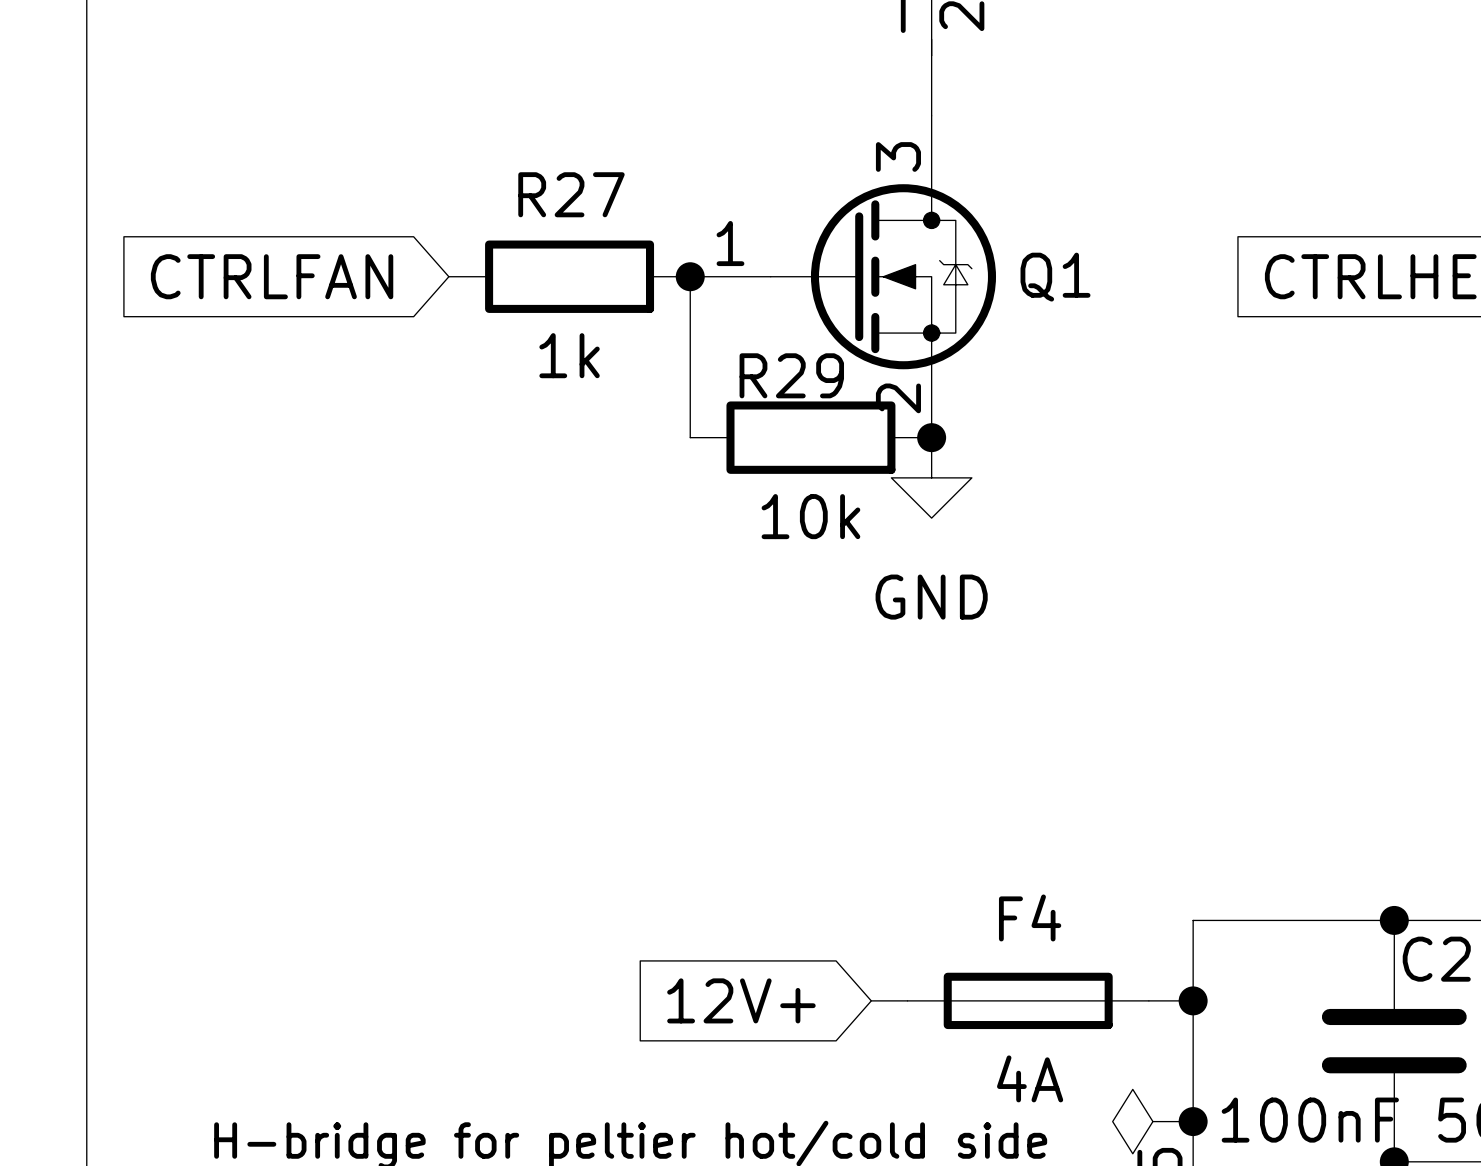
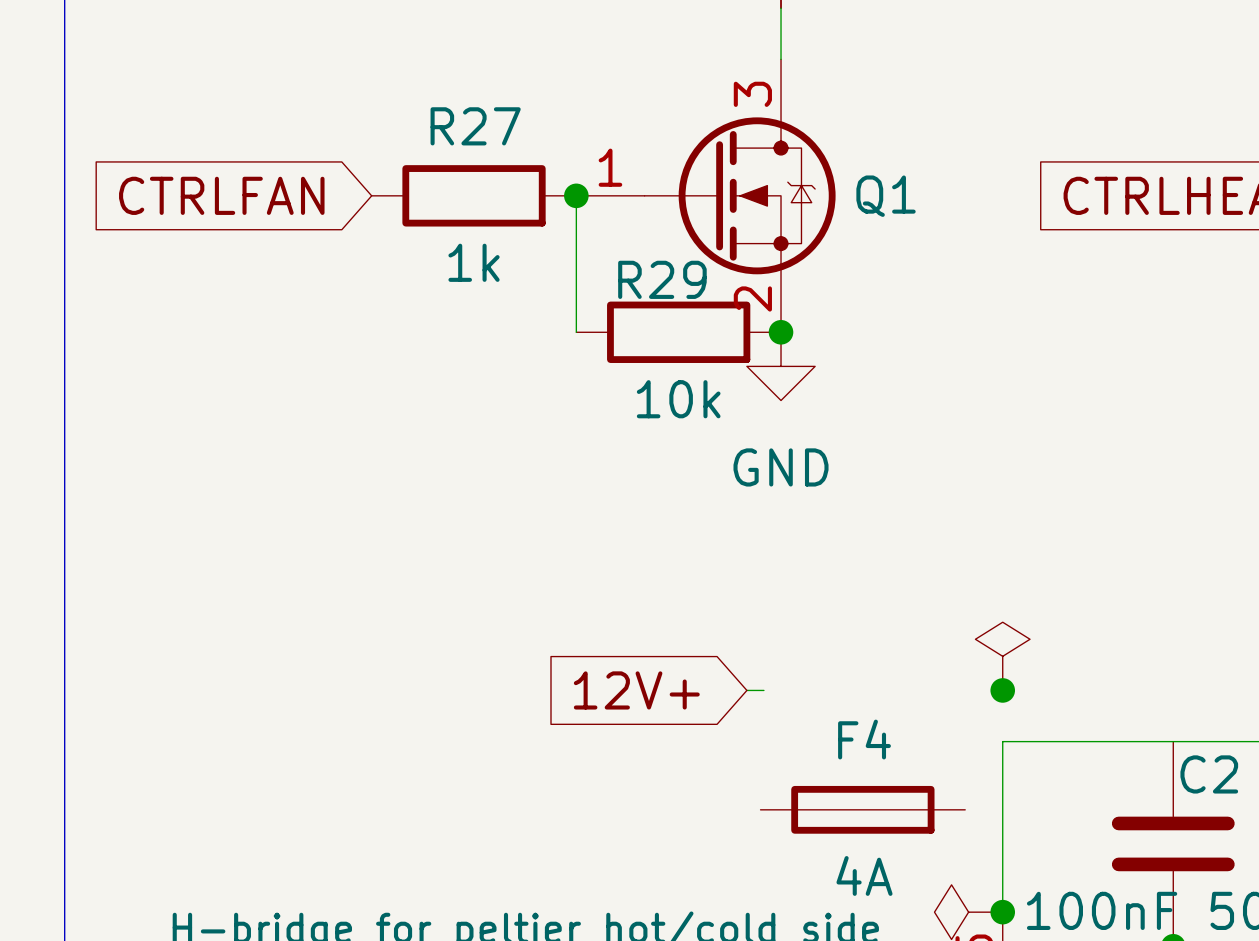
power symbol: none -> (1002, 656)
wire: none -> (746, 690) (763, 690)
junction: none -> (1002, 690)
junction: (1394, 920) -> none
global label position: 12V+ (741, 1000) -> 12V+ (636, 690)
wire: (871, 1000) (907, 1000) -> none
wire: (1148, 1000) (1193, 1000) -> none
junction: (1193, 1000) -> none

